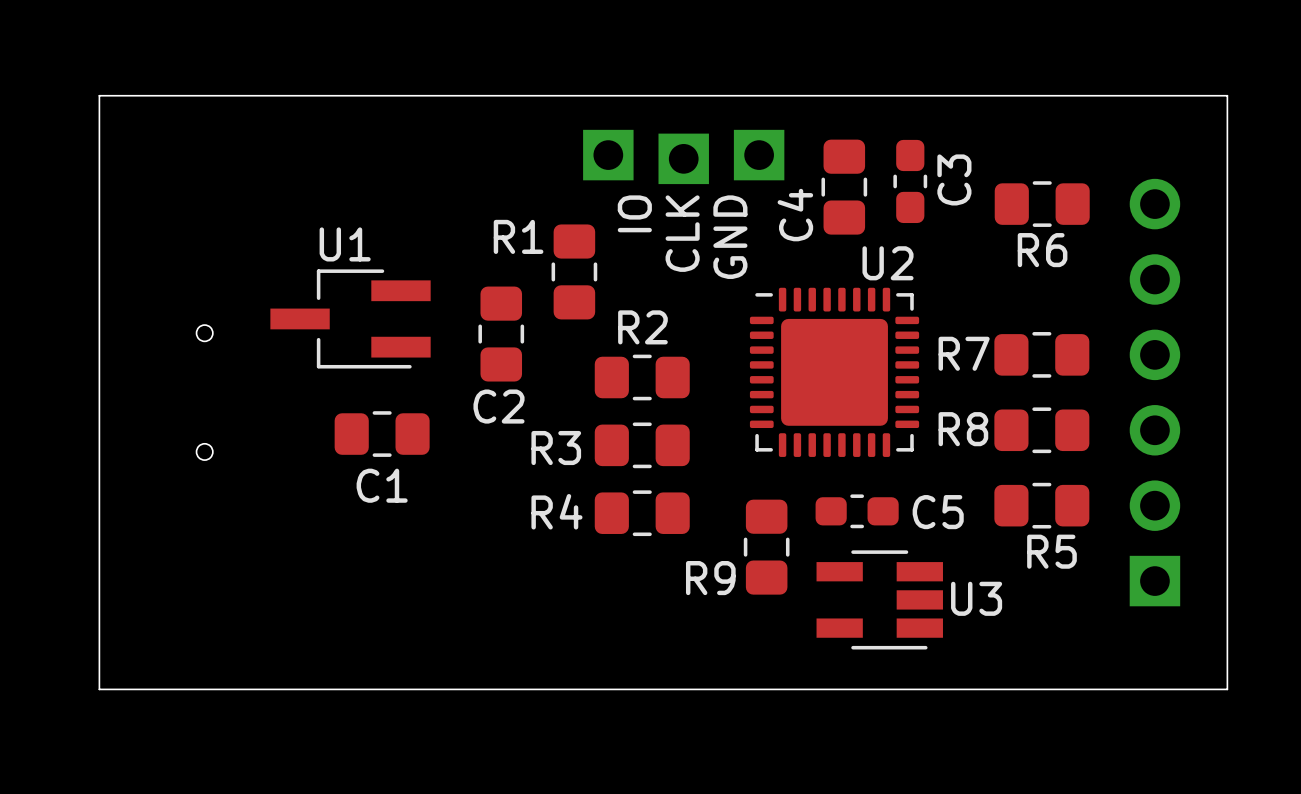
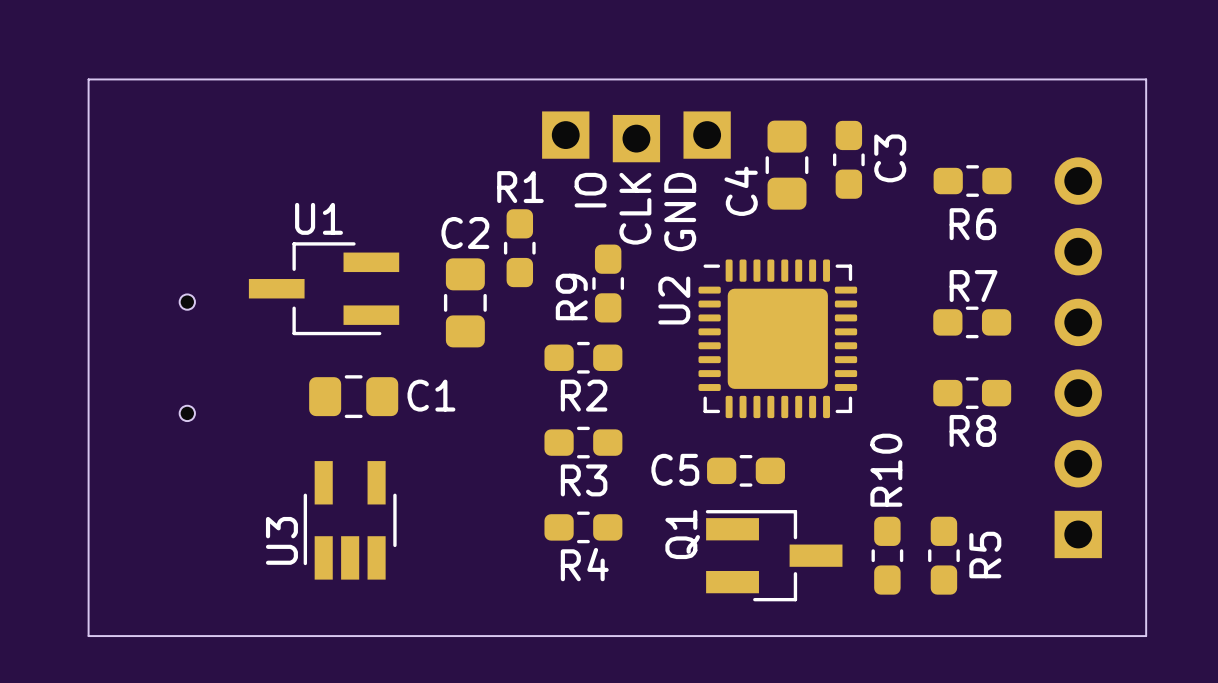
R6 footprint: [994, 181, 1090, 227] -> [933, 165, 1012, 197]
R1 footprint: [551, 224, 598, 320] -> [503, 209, 536, 288]
R1 name position: R1 (518, 236) -> R1 (520, 187)
U2 name rotation: 0° (888, 263) -> 90° counterclockwise (674, 300)
U2 name position: U2 (888, 263) -> U2 (674, 300)
R2 name position: R2 (642, 327) -> R2 (584, 395)
R7 footprint: [994, 332, 1090, 378] -> [933, 306, 1012, 339]
R7 name position: R7 (964, 353) -> R7 (973, 286)
R2 footprint: [594, 354, 690, 401] -> [544, 341, 623, 374]
C2 name position: C2 (499, 406) -> C2 (465, 233)
R8 footprint: [994, 407, 1090, 454] -> [933, 377, 1012, 409]
R3 footprint: [594, 422, 690, 469] -> [544, 426, 623, 459]
R8 name position: R8 (963, 429) -> R8 (972, 430)
R3 name position: R3 (556, 448) -> R3 (584, 480)
R5 footprint: [994, 482, 1090, 529] -> [928, 516, 960, 595]
C1 name position: C1 (382, 485) -> C1 (431, 395)
R4 footprint: [594, 490, 690, 537] -> [544, 511, 623, 544]
R9 footprint: [743, 499, 790, 595] -> [592, 244, 625, 323]
R4 name position: R4 (556, 511) -> R4 (584, 564)
C5 position: (857, 511) -> (746, 470)
C5 name position: C5 (938, 512) -> C5 (675, 469)
R5 name position: R5 (1051, 551) -> R5 (985, 555)
U3 name position: U3 (976, 598) -> U3 (281, 540)
U3 rotation: 0° (879, 599) -> 90° clockwise (350, 520)
U3 position: (879, 599) -> (350, 520)
Q1: none -> (774, 555)
R10: none -> (887, 555)

